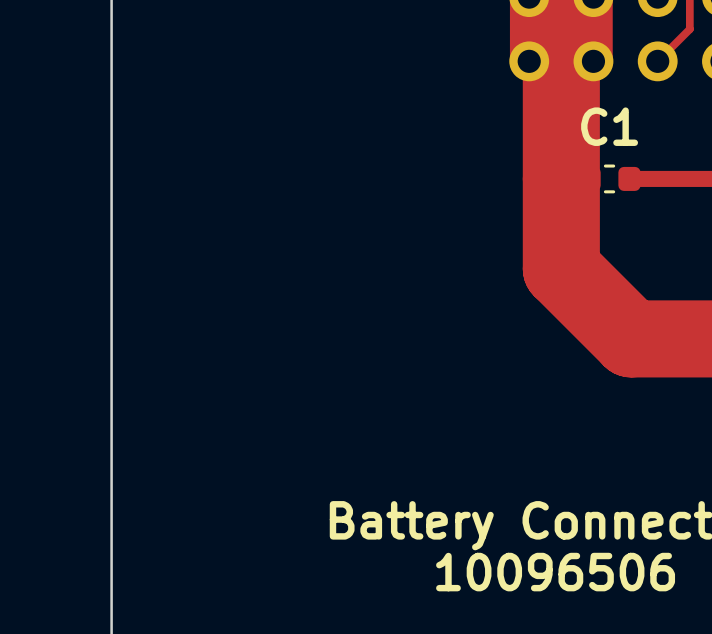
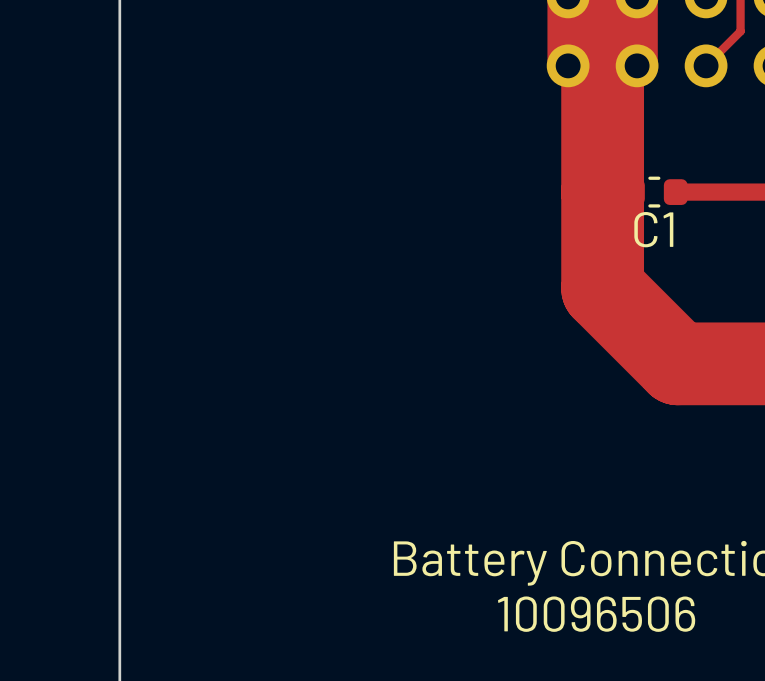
C1 name position: C1 (609, 126) -> C1 (653, 229)

